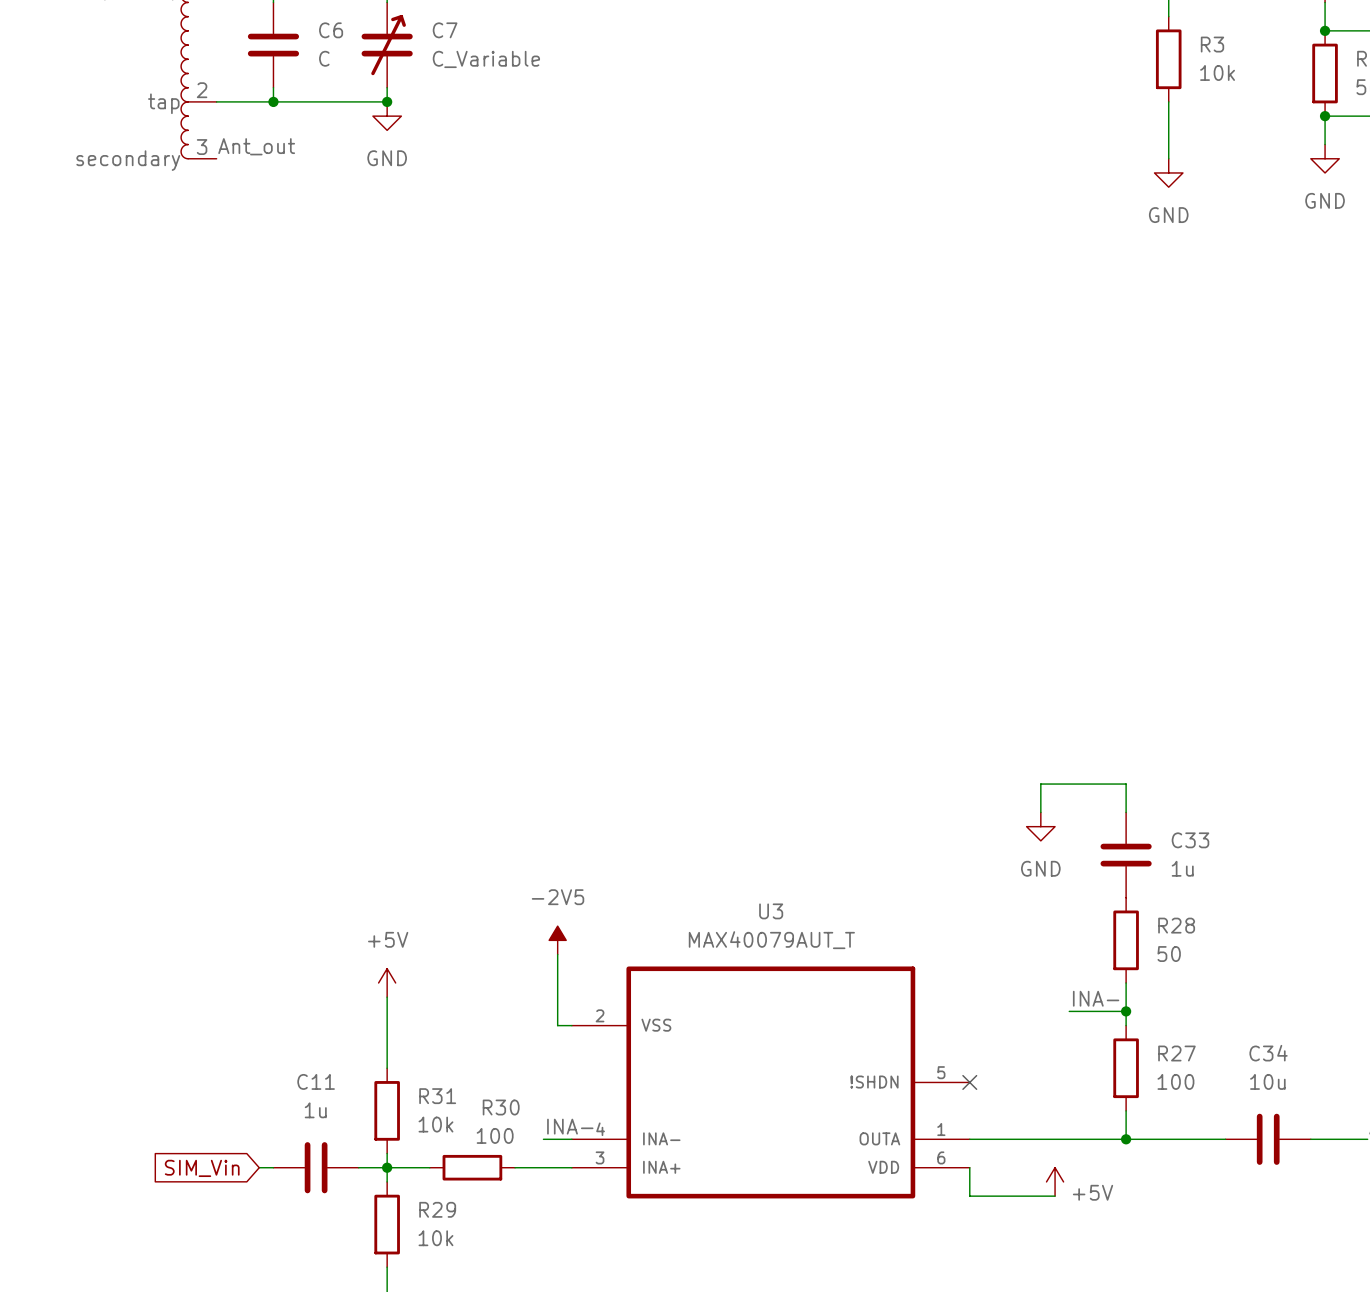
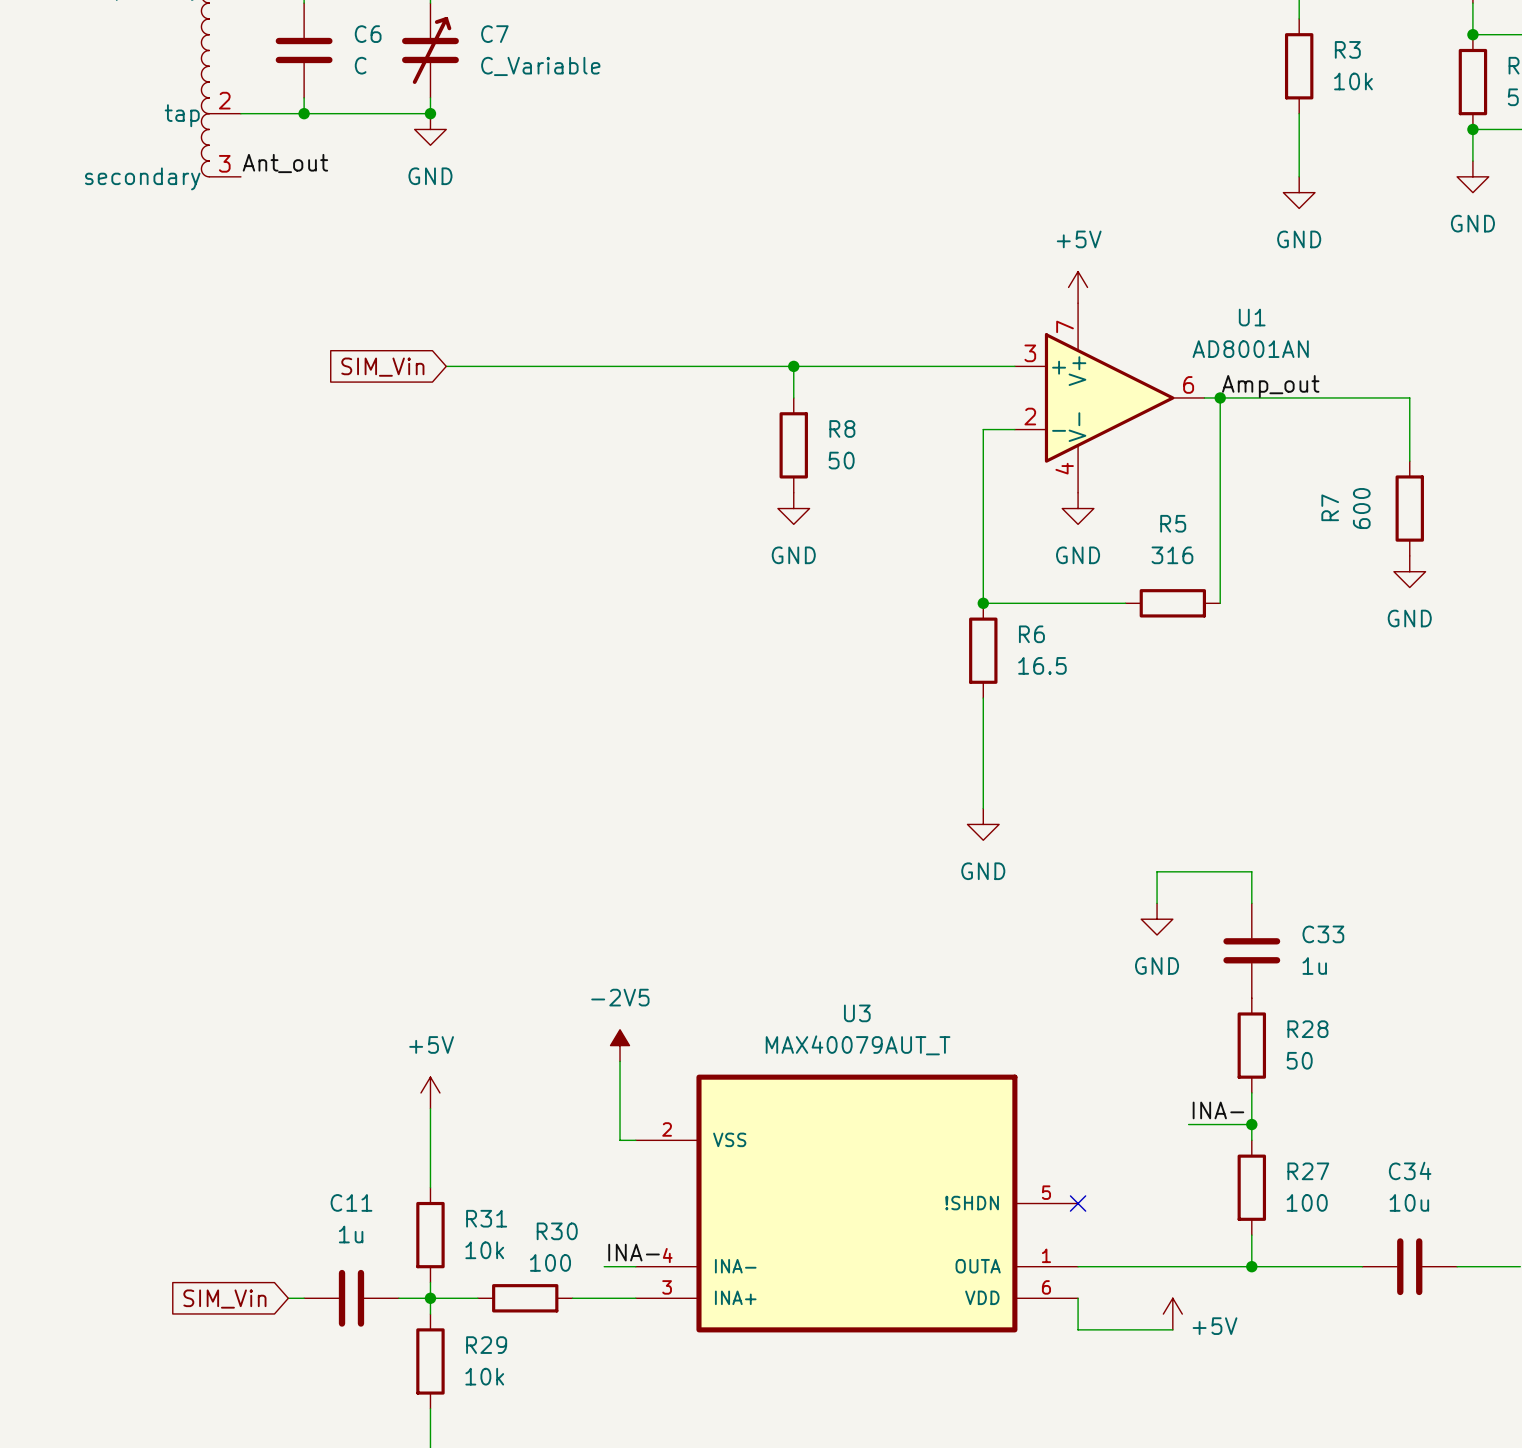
power symbol: none -> +5V (1078, 287)
global label: none -> SIM_Vin (382, 367)
wire: none -> (446, 366) (1014, 366)
wire: none -> (793, 366) (793, 397)
junction: none -> (793, 366)
label: none -> Amp_out (1270, 386)
U1: none -> AD8001AN (1109, 397)
wire: none -> (1204, 397) (1409, 397) (1409, 461)
wire: none -> (1220, 397) (1220, 603)
junction: none -> (1220, 397)
wire: none -> (1014, 429) (983, 429) (983, 603) (1125, 603)
R8: none -> 50 (793, 445)
power symbol: none -> GND (793, 508)
power symbol: none -> GND (1078, 508)
R7: none -> 600 (1409, 508)
power symbol: none -> GND (1409, 571)
junction: none -> (983, 603)
R5: none -> 316 (1172, 603)
R6: none -> 16.5 (983, 650)
wire: none -> (983, 698) (983, 808)
power symbol: none -> GND (983, 824)

